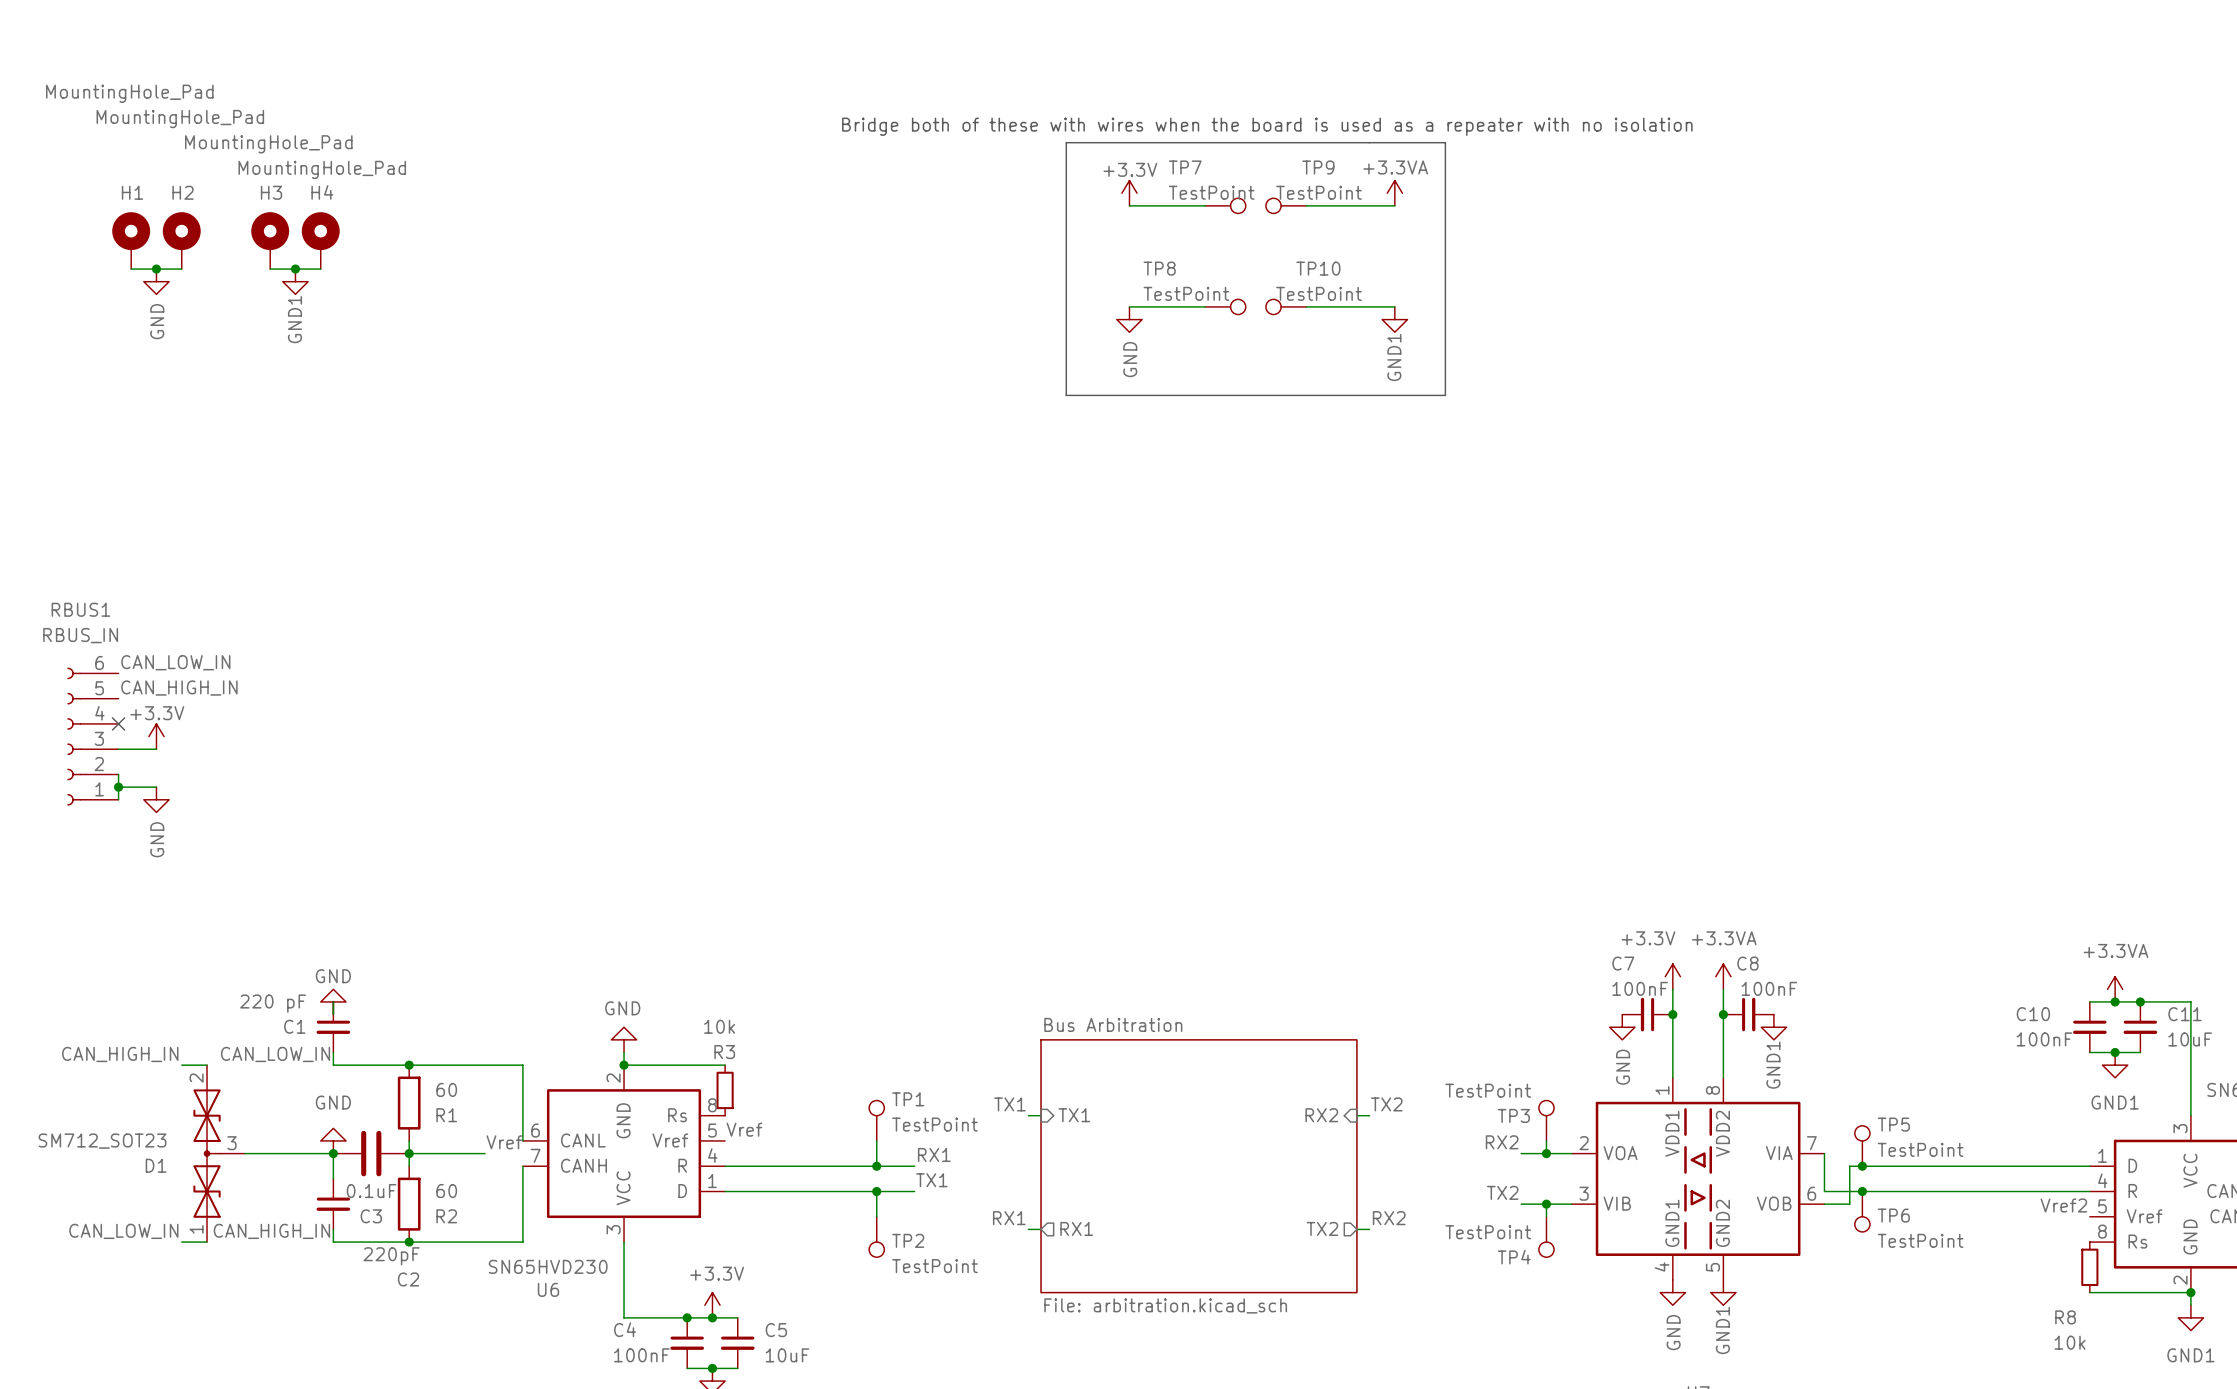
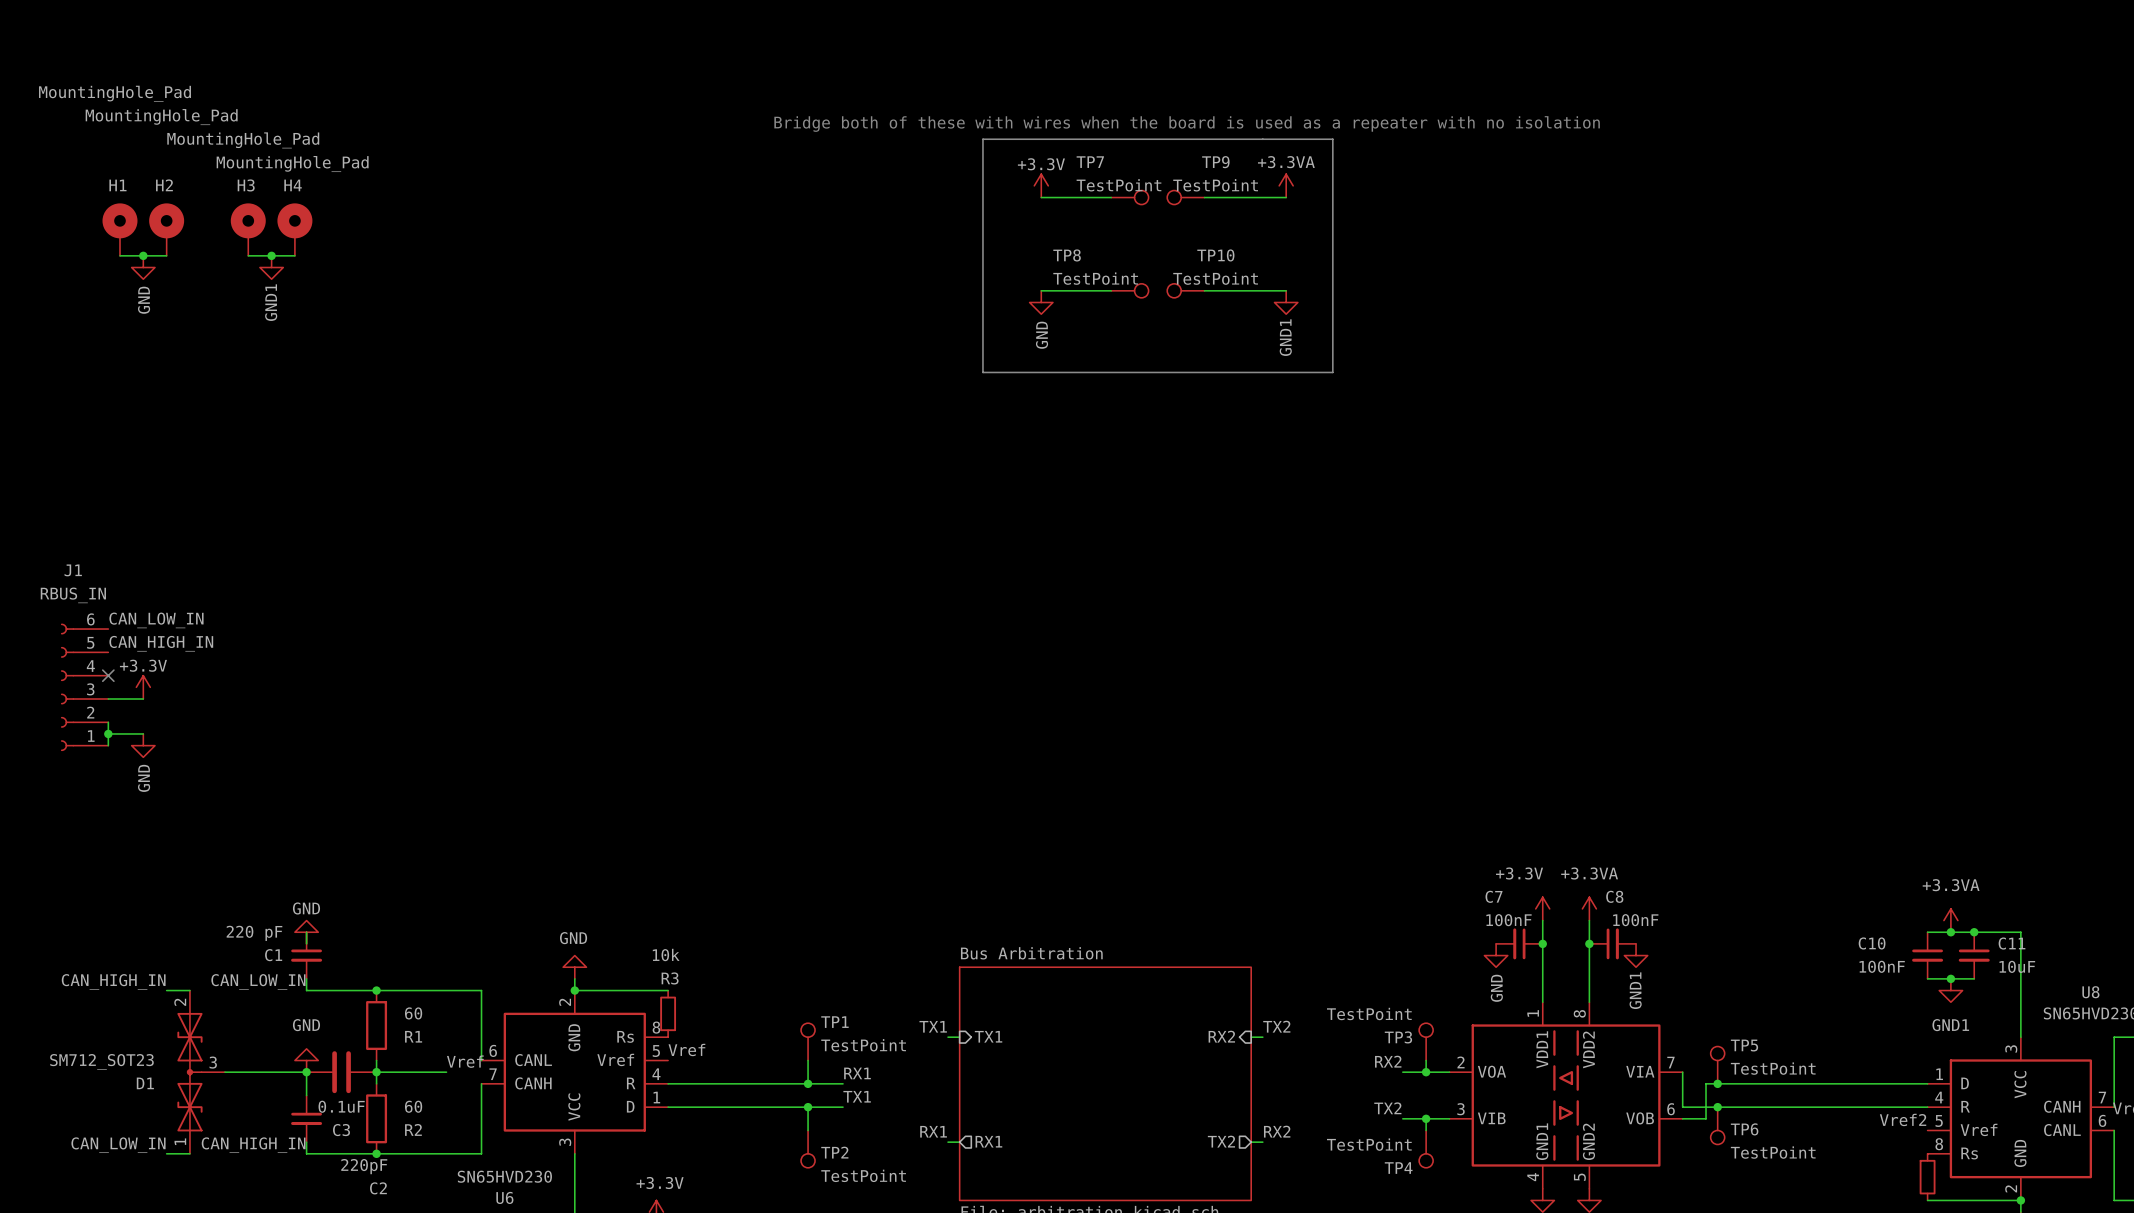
RBUS1 name: RBUS1 (80, 609) -> J1 (73, 570)

